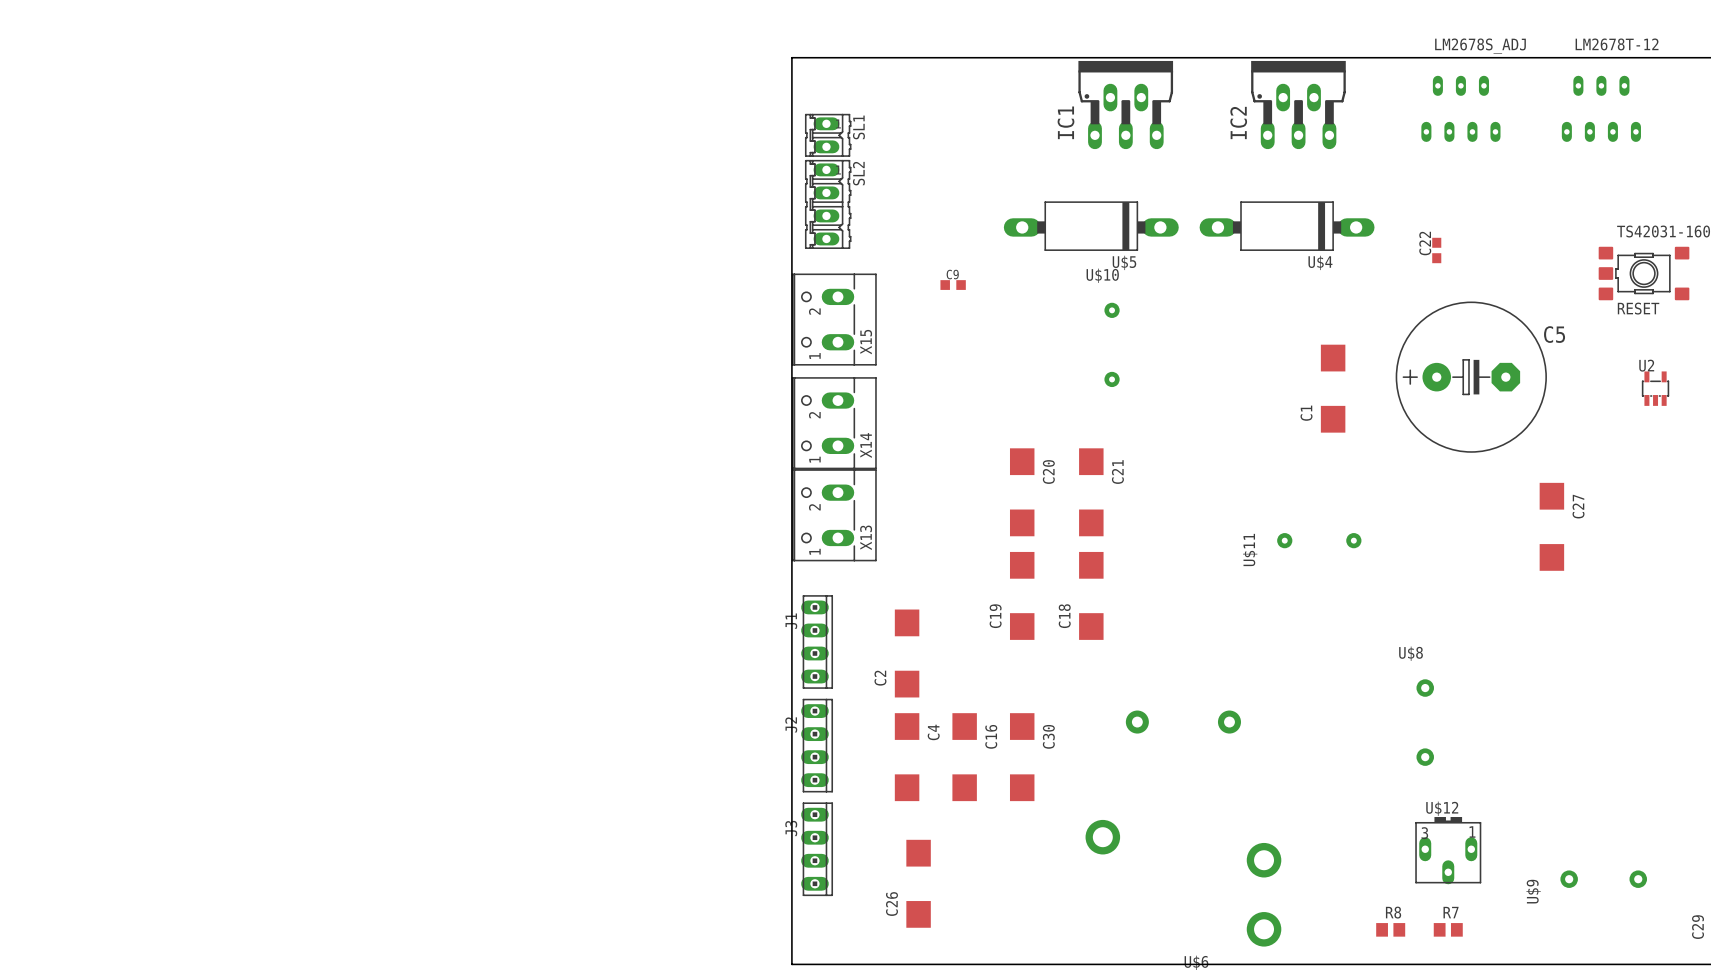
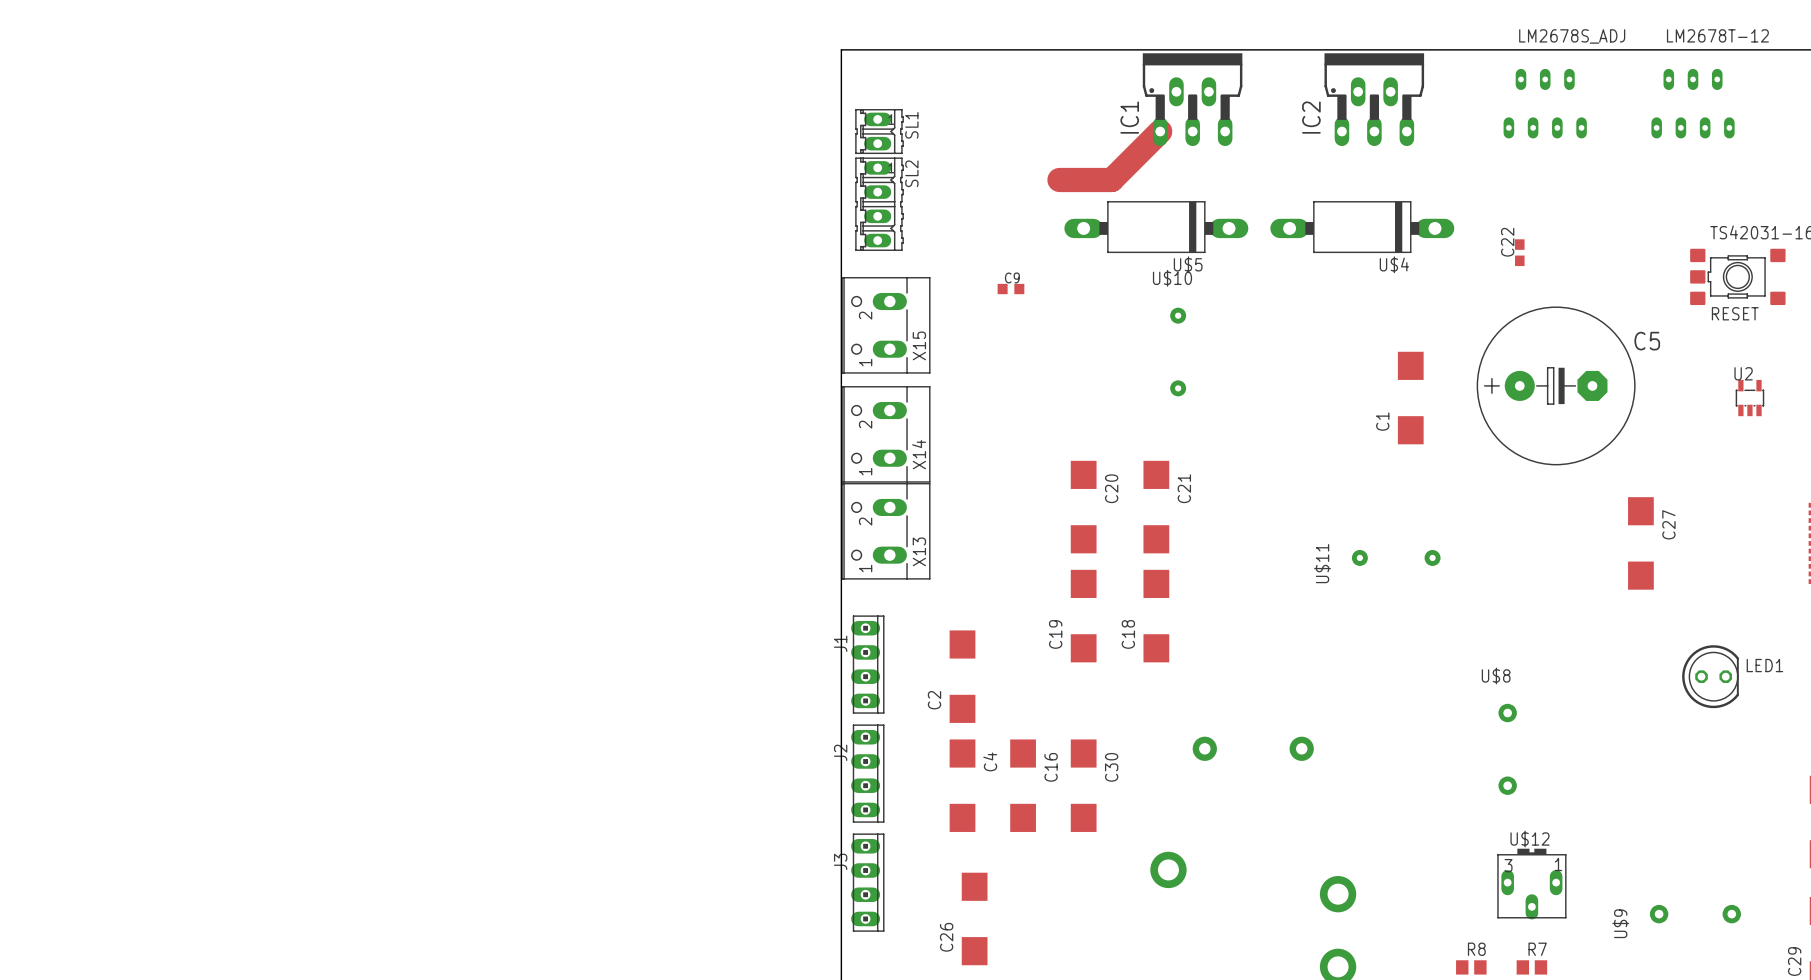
track: none -> (1160, 131) (1111, 179) (1059, 179)
LED1: none -> (1710, 676)

